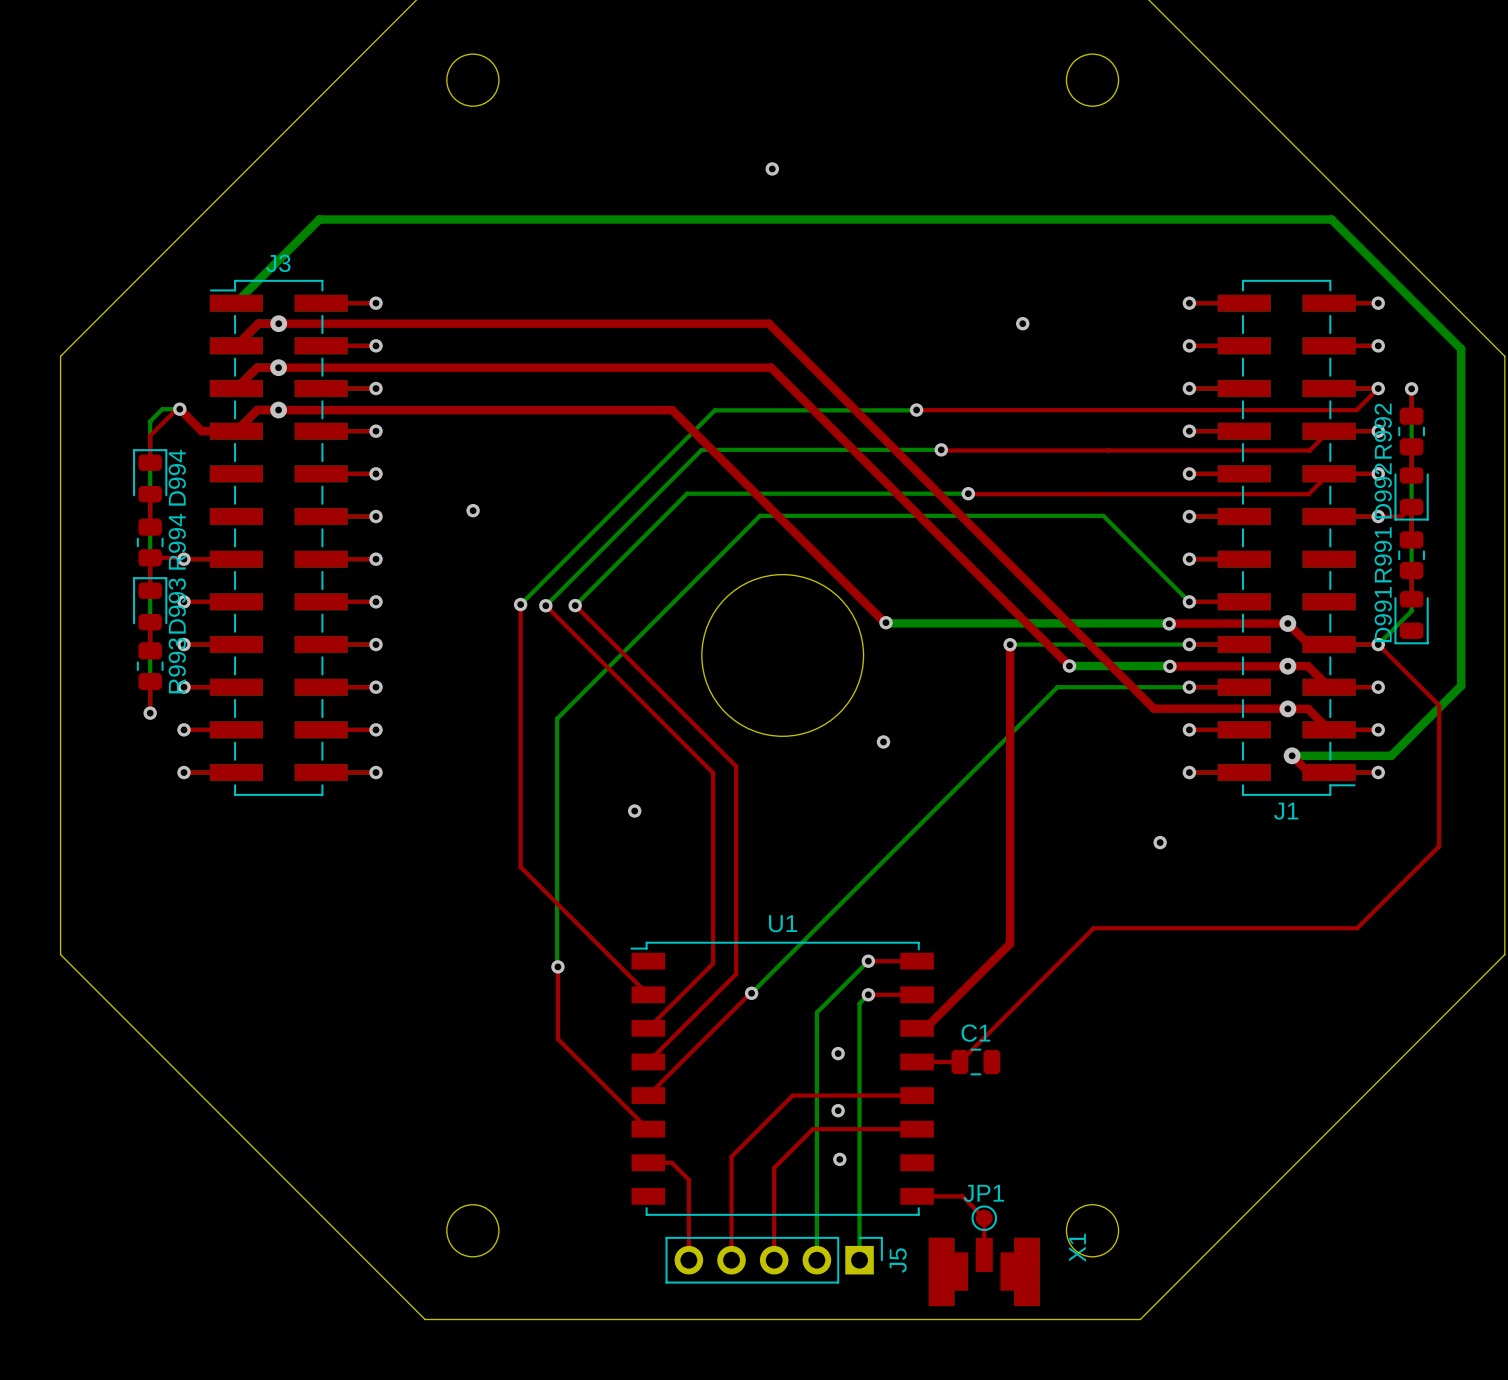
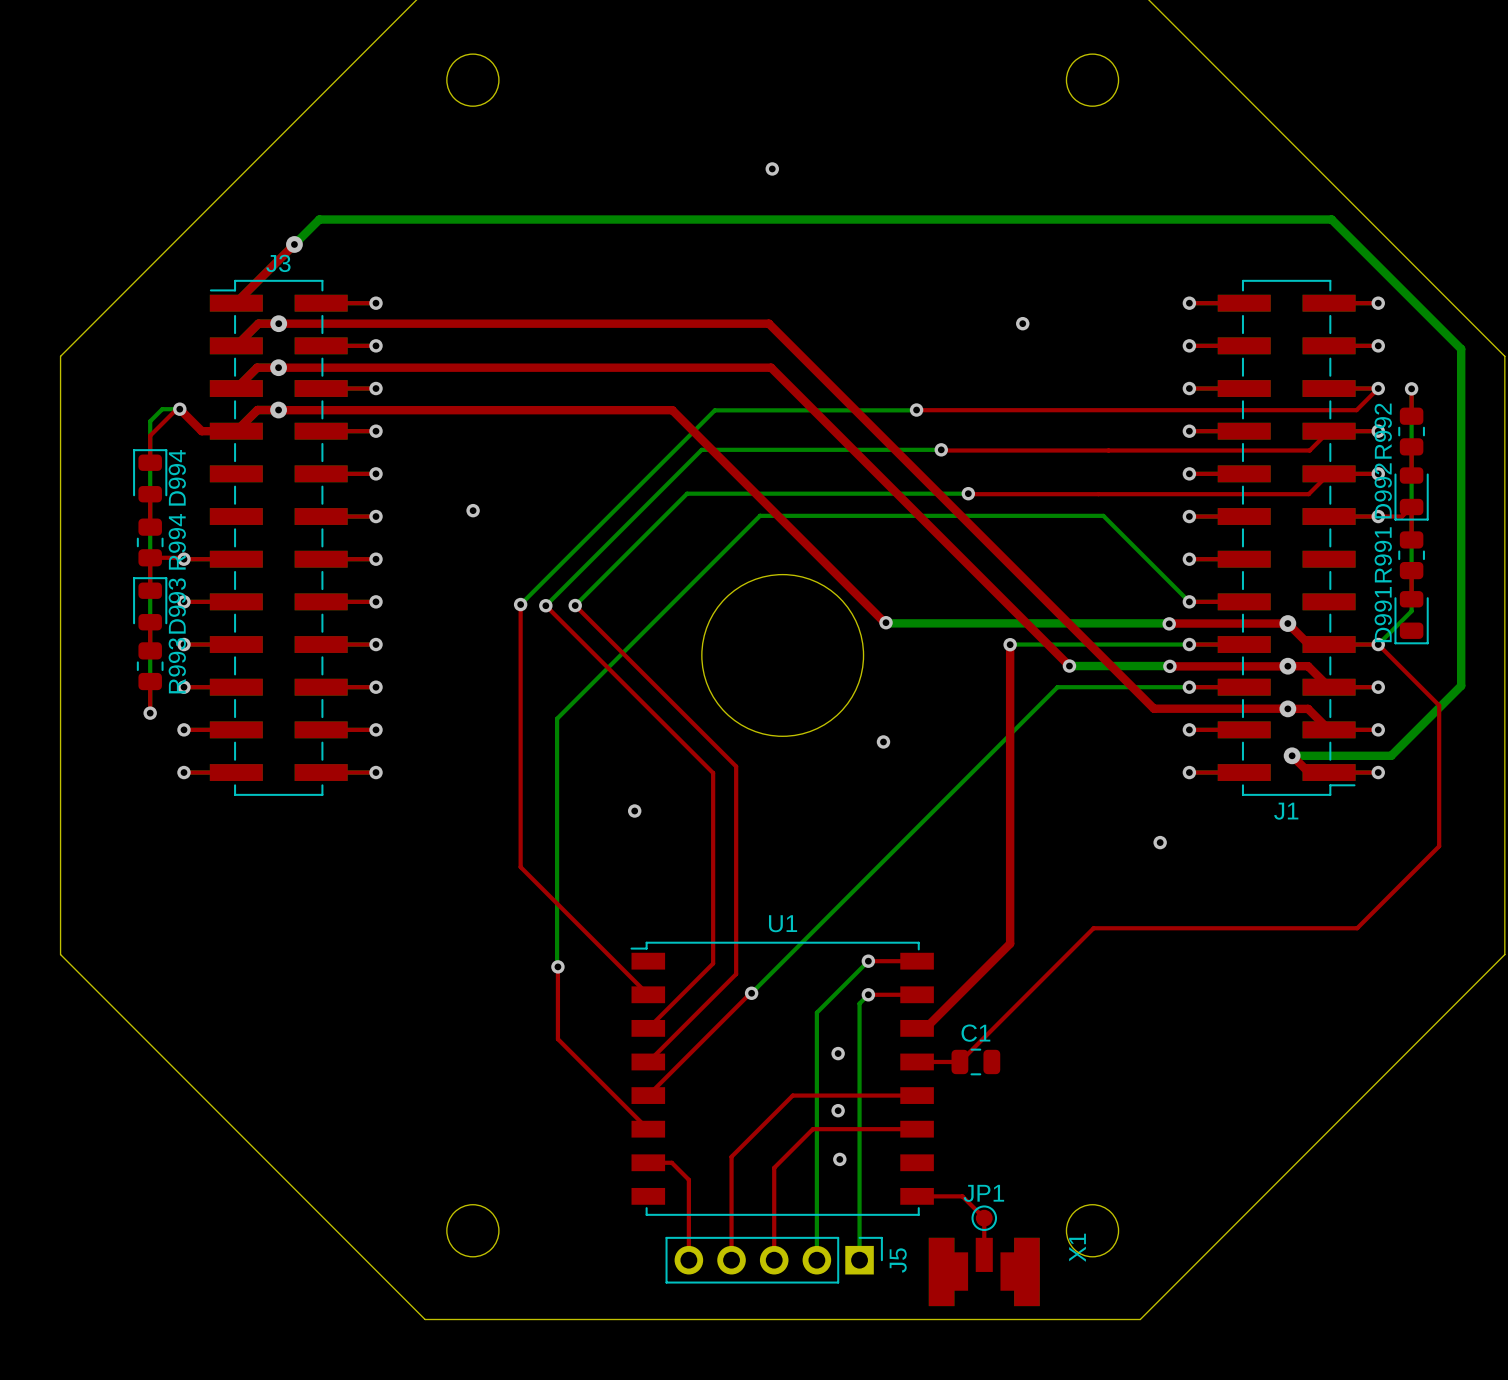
top track: none -> (294, 244) (236, 303)
via: none -> (294, 244)

